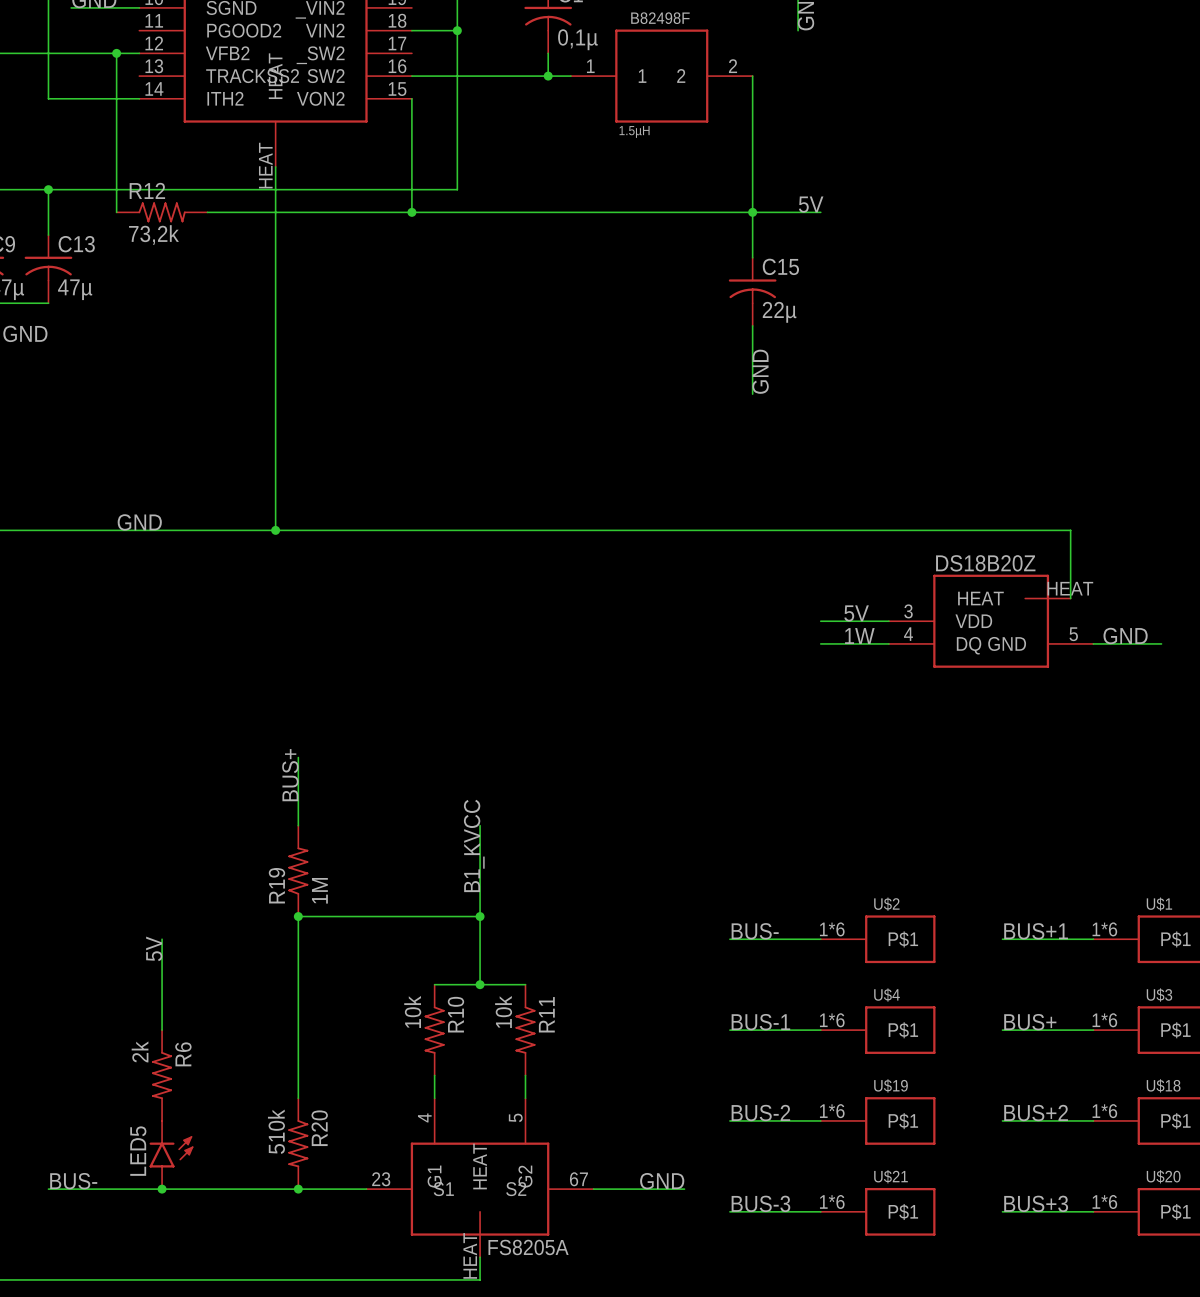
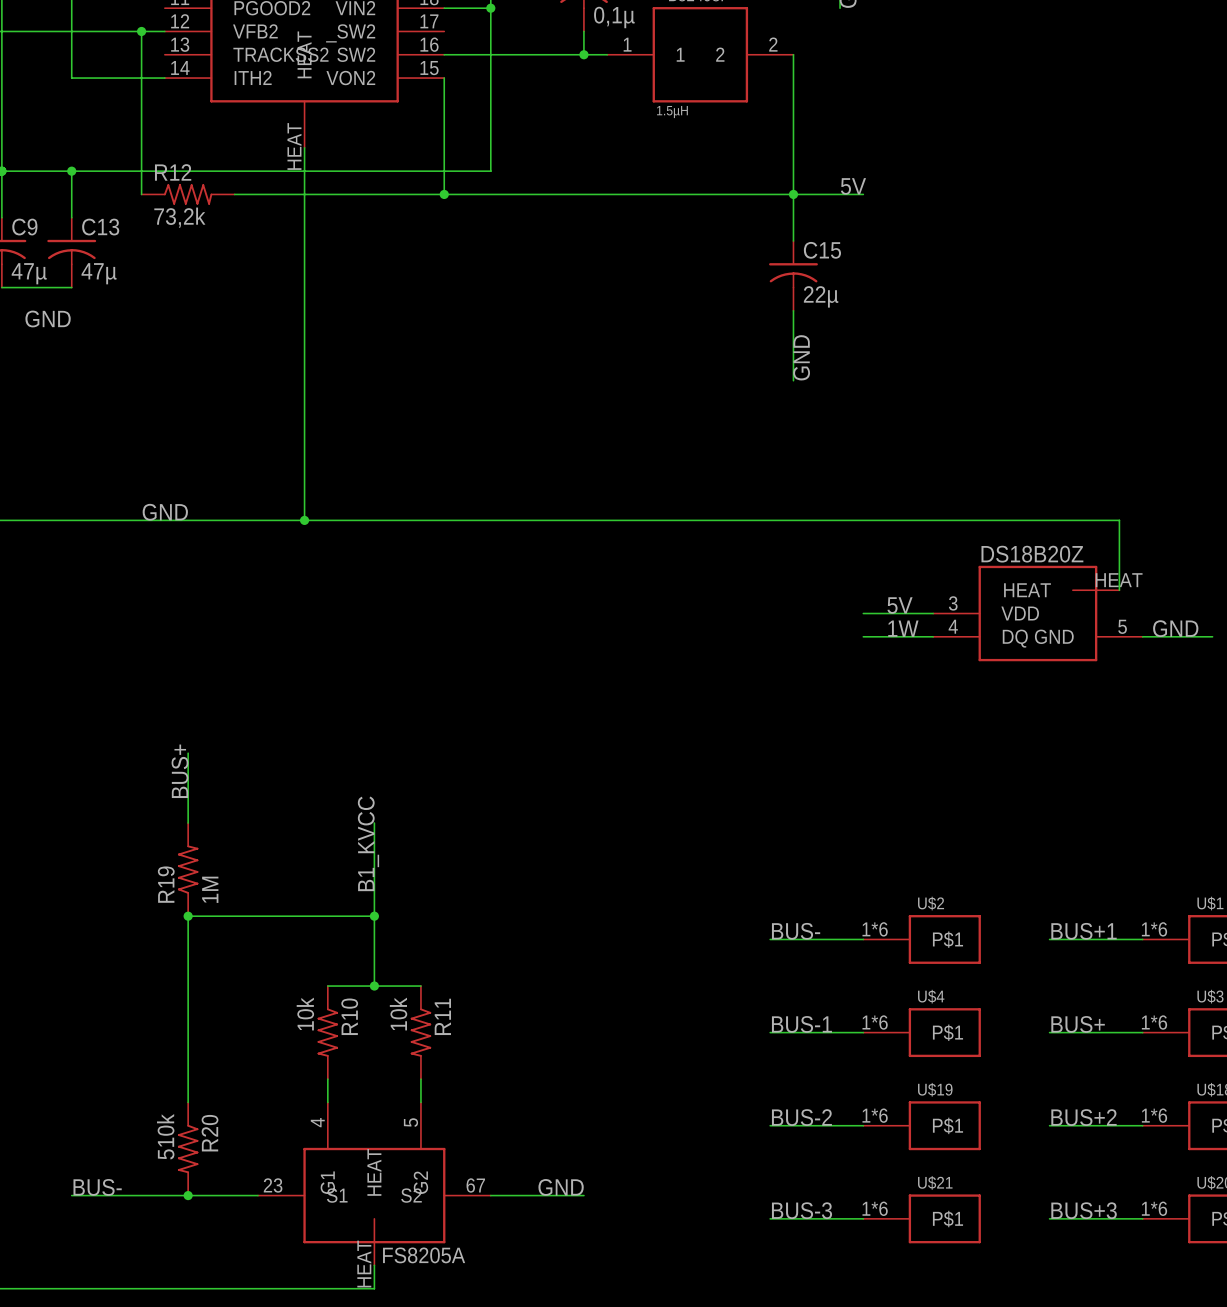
wire: (298, 757) (298, 825) -> (188, 753) (188, 823)
label position: BUS+ (290, 775) -> BUS+ (179, 771)
wire: (480, 825) (480, 984) -> (374, 823) (374, 986)
label position: B1_KVCC (474, 845) -> B1_KVCC (368, 843)
R19 position: (298, 871) -> (188, 869)
junction: none -> (188, 916)
wire: (298, 916) (298, 1075) -> (327, 916) (188, 916) (188, 939)
junction: (298, 916) -> none
wire: (343, 916) (480, 916) -> none
junction: none -> (374, 916)
junction: (480, 916) -> none
label: 5V (154, 948) -> none
junction: none -> (374, 986)
wire: (434, 984) (525, 984) -> (327, 986) (420, 986)
junction: (480, 984) -> none
R10 position: (434, 1030) -> (327, 1032)
R11 position: (525, 1030) -> (420, 1032)
R6: 2k (162, 1075) -> none
wire: (434, 1075) (434, 1098) -> none
wire: (525, 1075) (525, 1098) -> (420, 1079) (420, 1102)
R20 position: (298, 1143) -> (188, 1149)
LED5: (171, 1155) -> none
part position: (480, 1177) -> (374, 1183)
label position: GND (662, 1181) -> GND (561, 1187)
wire: (230, 1189) (366, 1189) -> none
junction: (298, 1189) -> none
wire: (593, 1189) (684, 1189) -> (490, 1195) (583, 1195)
wire: (480, 1257) (480, 1279) (343, 1279) -> (374, 1265) (374, 1288)

